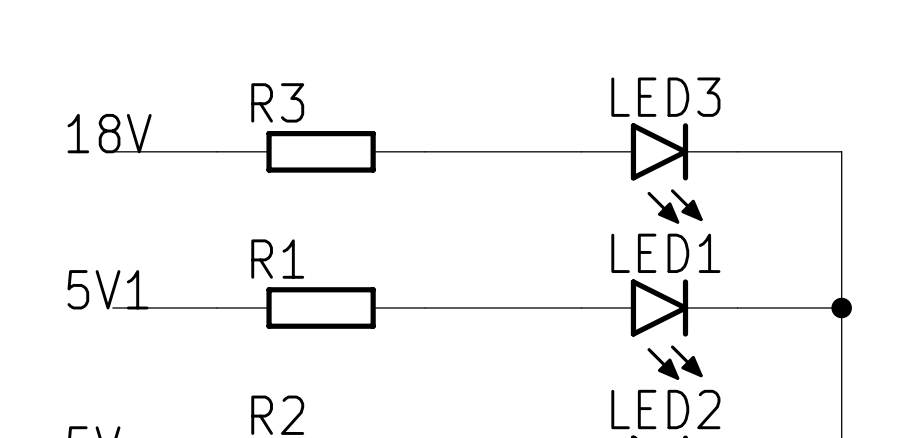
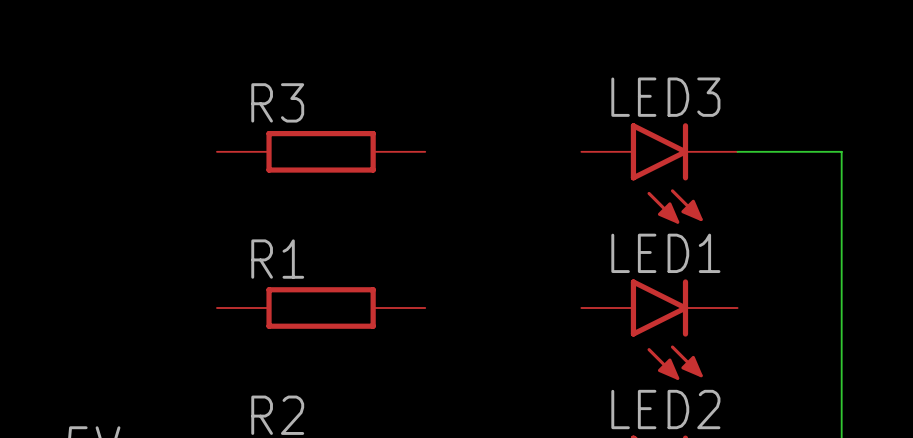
label: 18V (109, 133) -> none
wire: (112, 151) (216, 151) -> none
wire: (425, 151) (581, 151) -> none
label: 5V1 (108, 289) -> none
wire: (112, 308) (216, 308) -> none
wire: (425, 308) (581, 308) -> none
wire: (737, 308) (841, 308) -> none
junction: (841, 308) -> none

